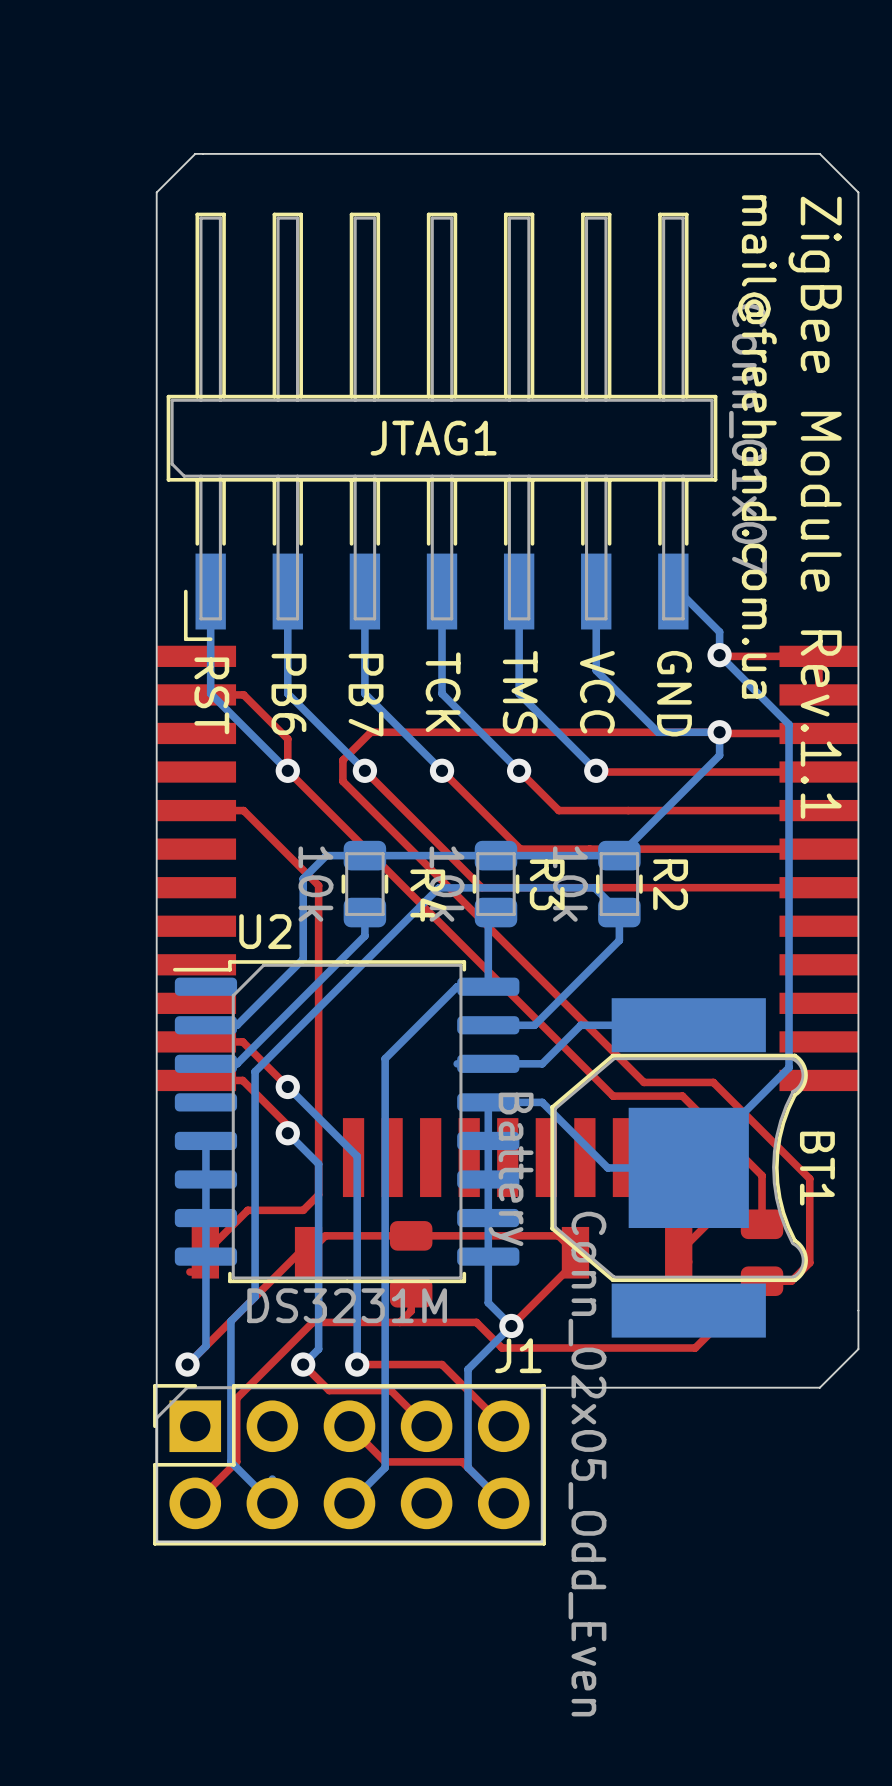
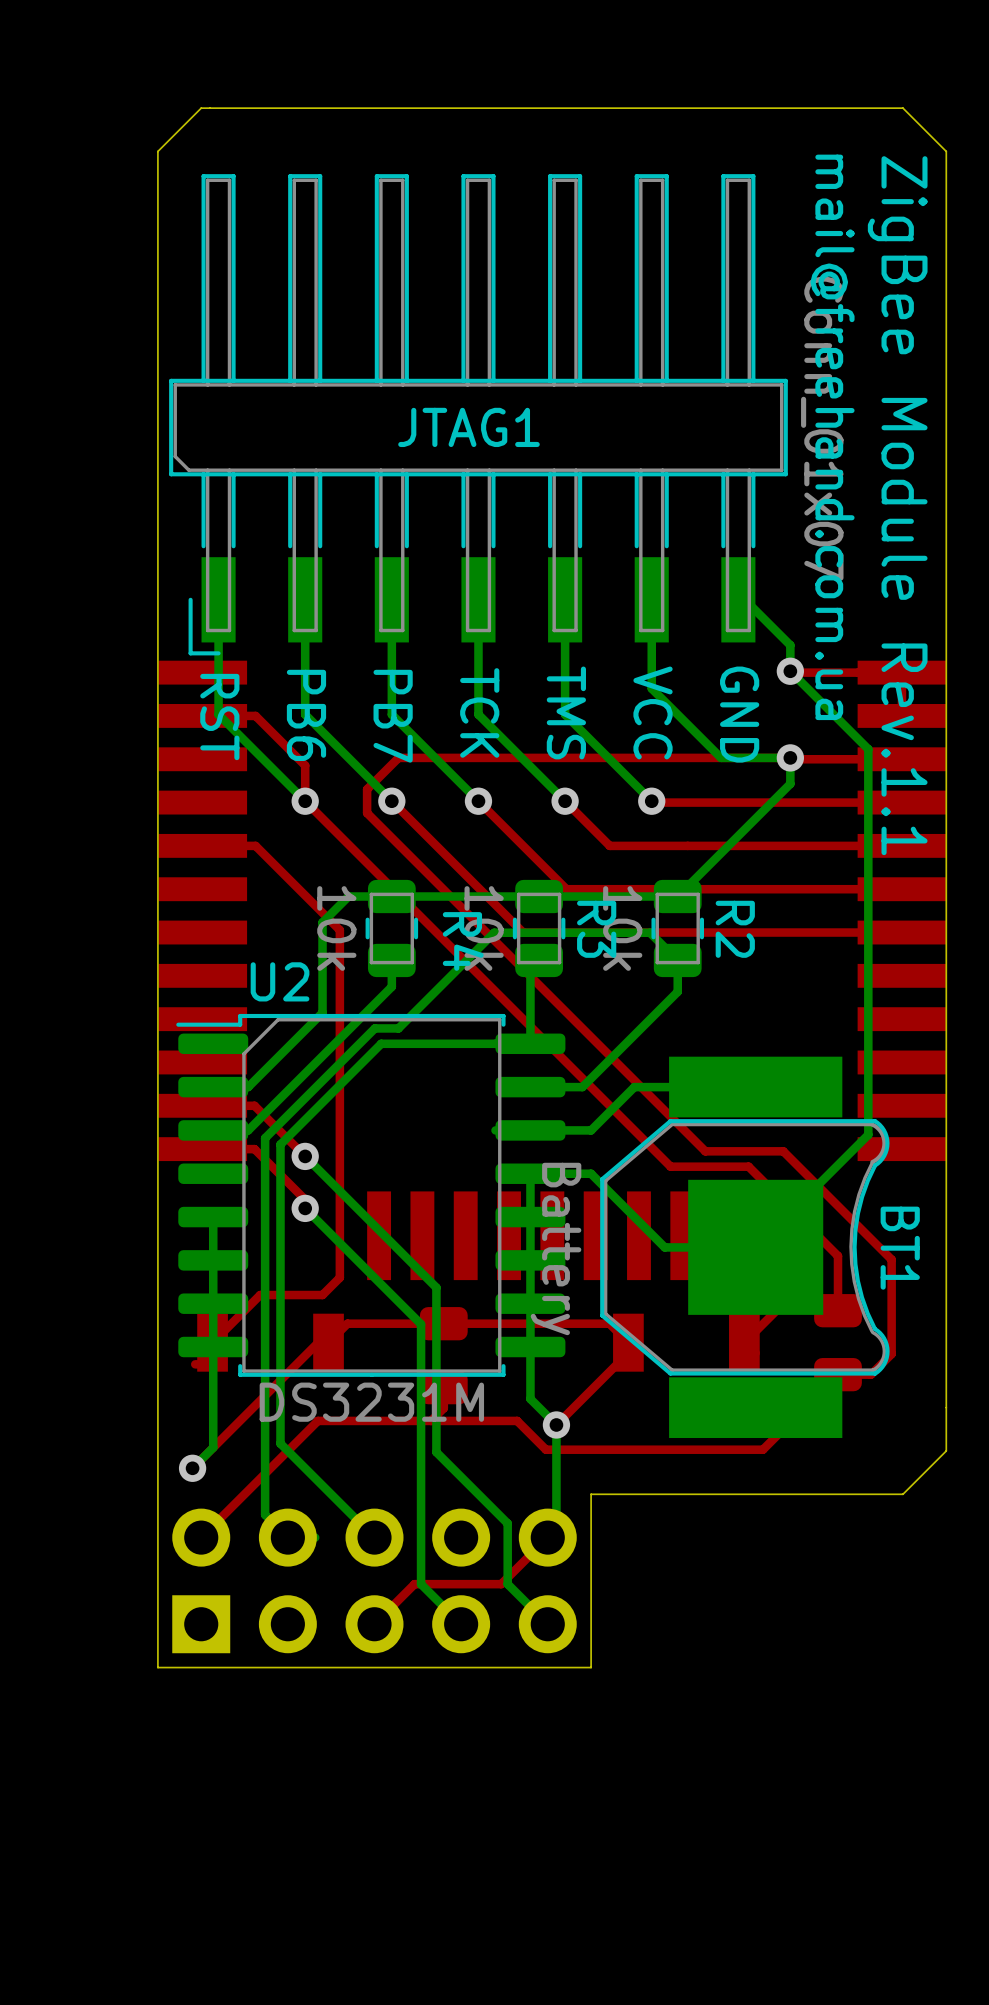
bottom track: (456, 887) (438, 887) (255, 1071) (255, 1297) (230, 1321) (230, 1461) (272, 1503) (272, 1479) -> (494, 932) (398, 1028) (374, 1028) (265, 1138) (265, 1514) (287, 1537) (315, 1537)
bottom track: (457, 986) (385, 1058) (385, 1467) (349, 1503) -> (495, 1043) (381, 1043) (280, 1144) (280, 1443) (374, 1537)
bottom track: (357, 1156) (357, 1364) -> (383, 1234) (436, 1287) (436, 1452) (507, 1523)
bottom track: (318, 1164) (318, 1349) (303, 1364) -> (339, 1243) (421, 1324) (421, 1584) (461, 1624)
top track: (312, 1322) (236, 1398) (236, 1461) (195, 1503) -> (333, 1420) (317, 1420) (201, 1537)
bottom track: (511, 1326) (468, 1369) (468, 1413) -> (556, 1424) (556, 1528) (547, 1537)
top track: (303, 1364) (329, 1390) (390, 1390) (426, 1426) -> none
via: (303, 1364) -> none
top track: (357, 1364) (442, 1364) (503, 1426) -> (374, 1624) (414, 1584) (501, 1584) (547, 1537)
via: (357, 1364) -> none
top track: (349, 1426) (385, 1461) (462, 1461) (503, 1503) -> none
J1 side: bottom (349, 1464) -> top (374, 1580)

